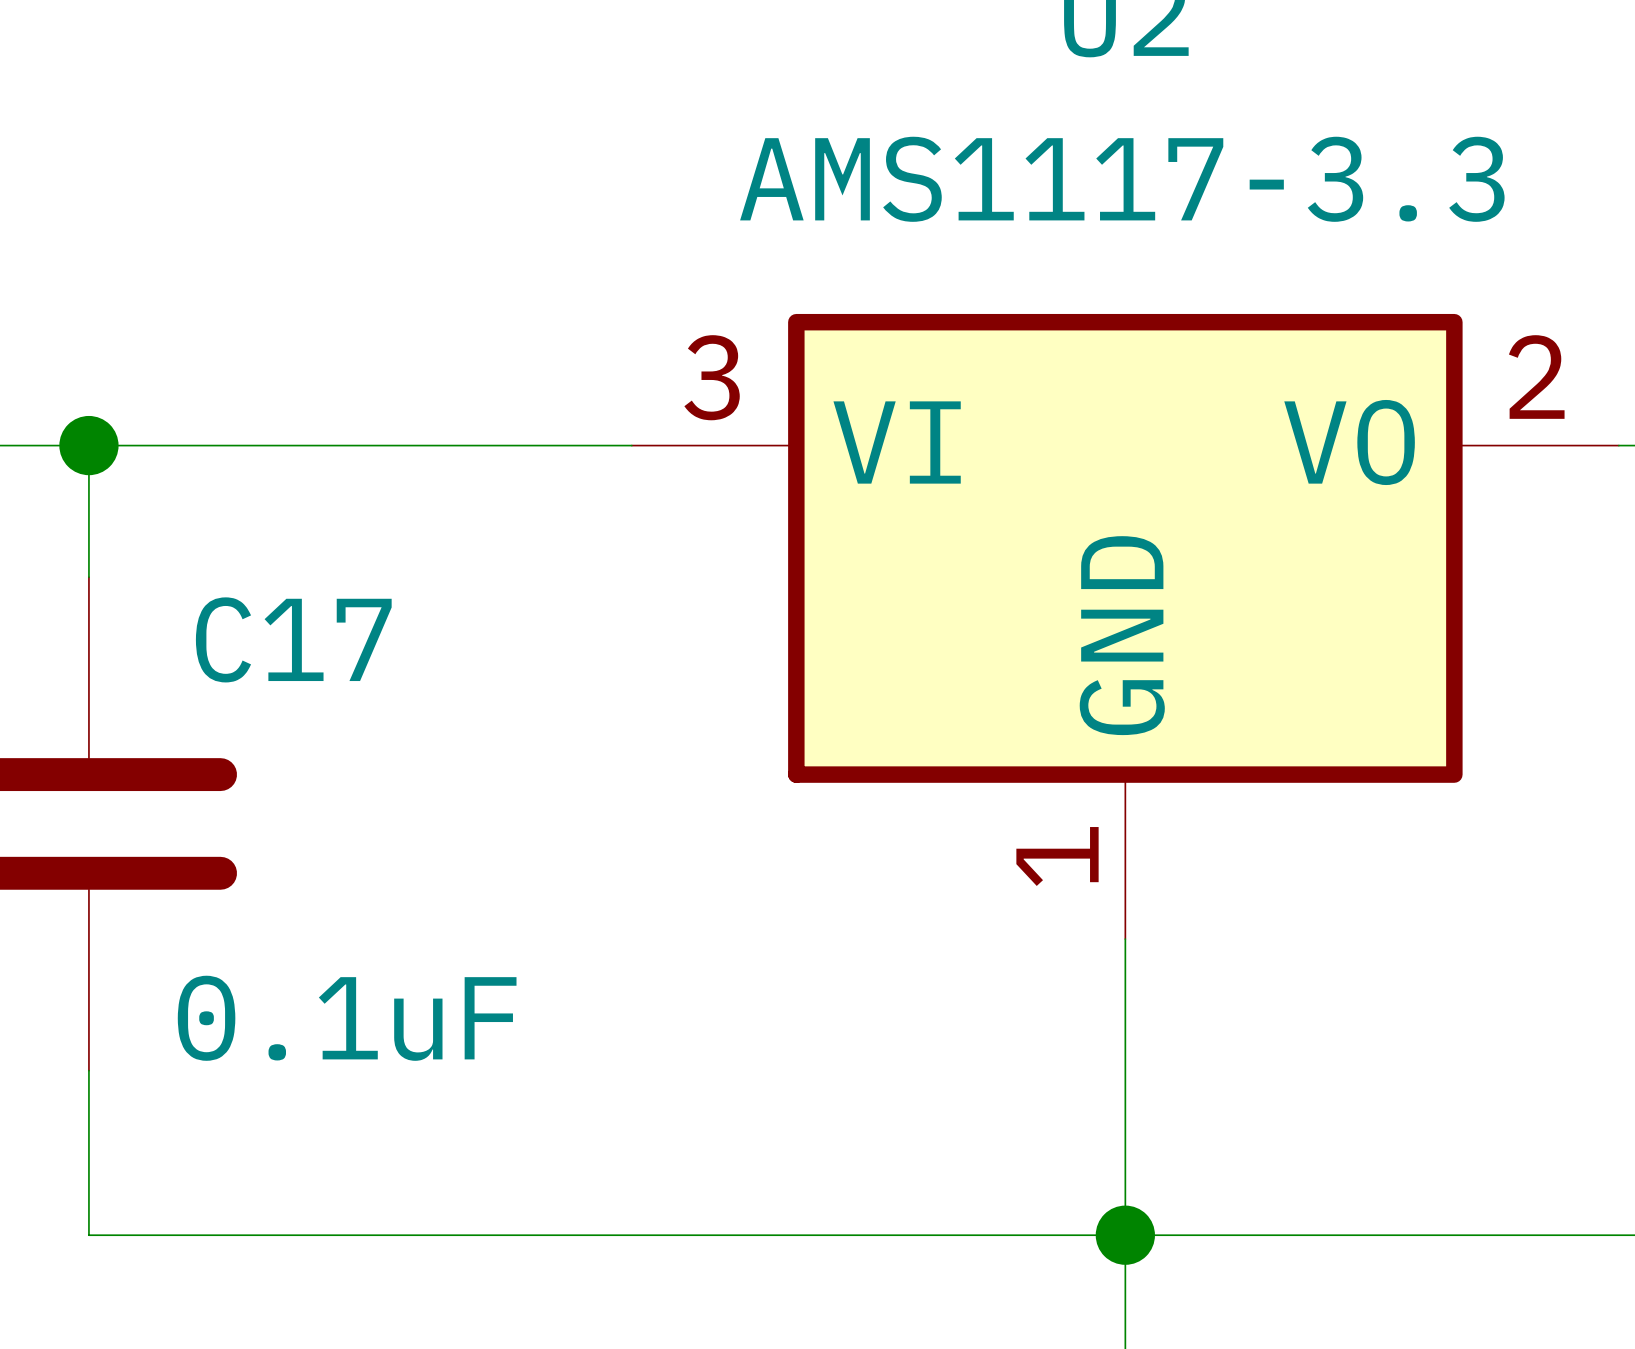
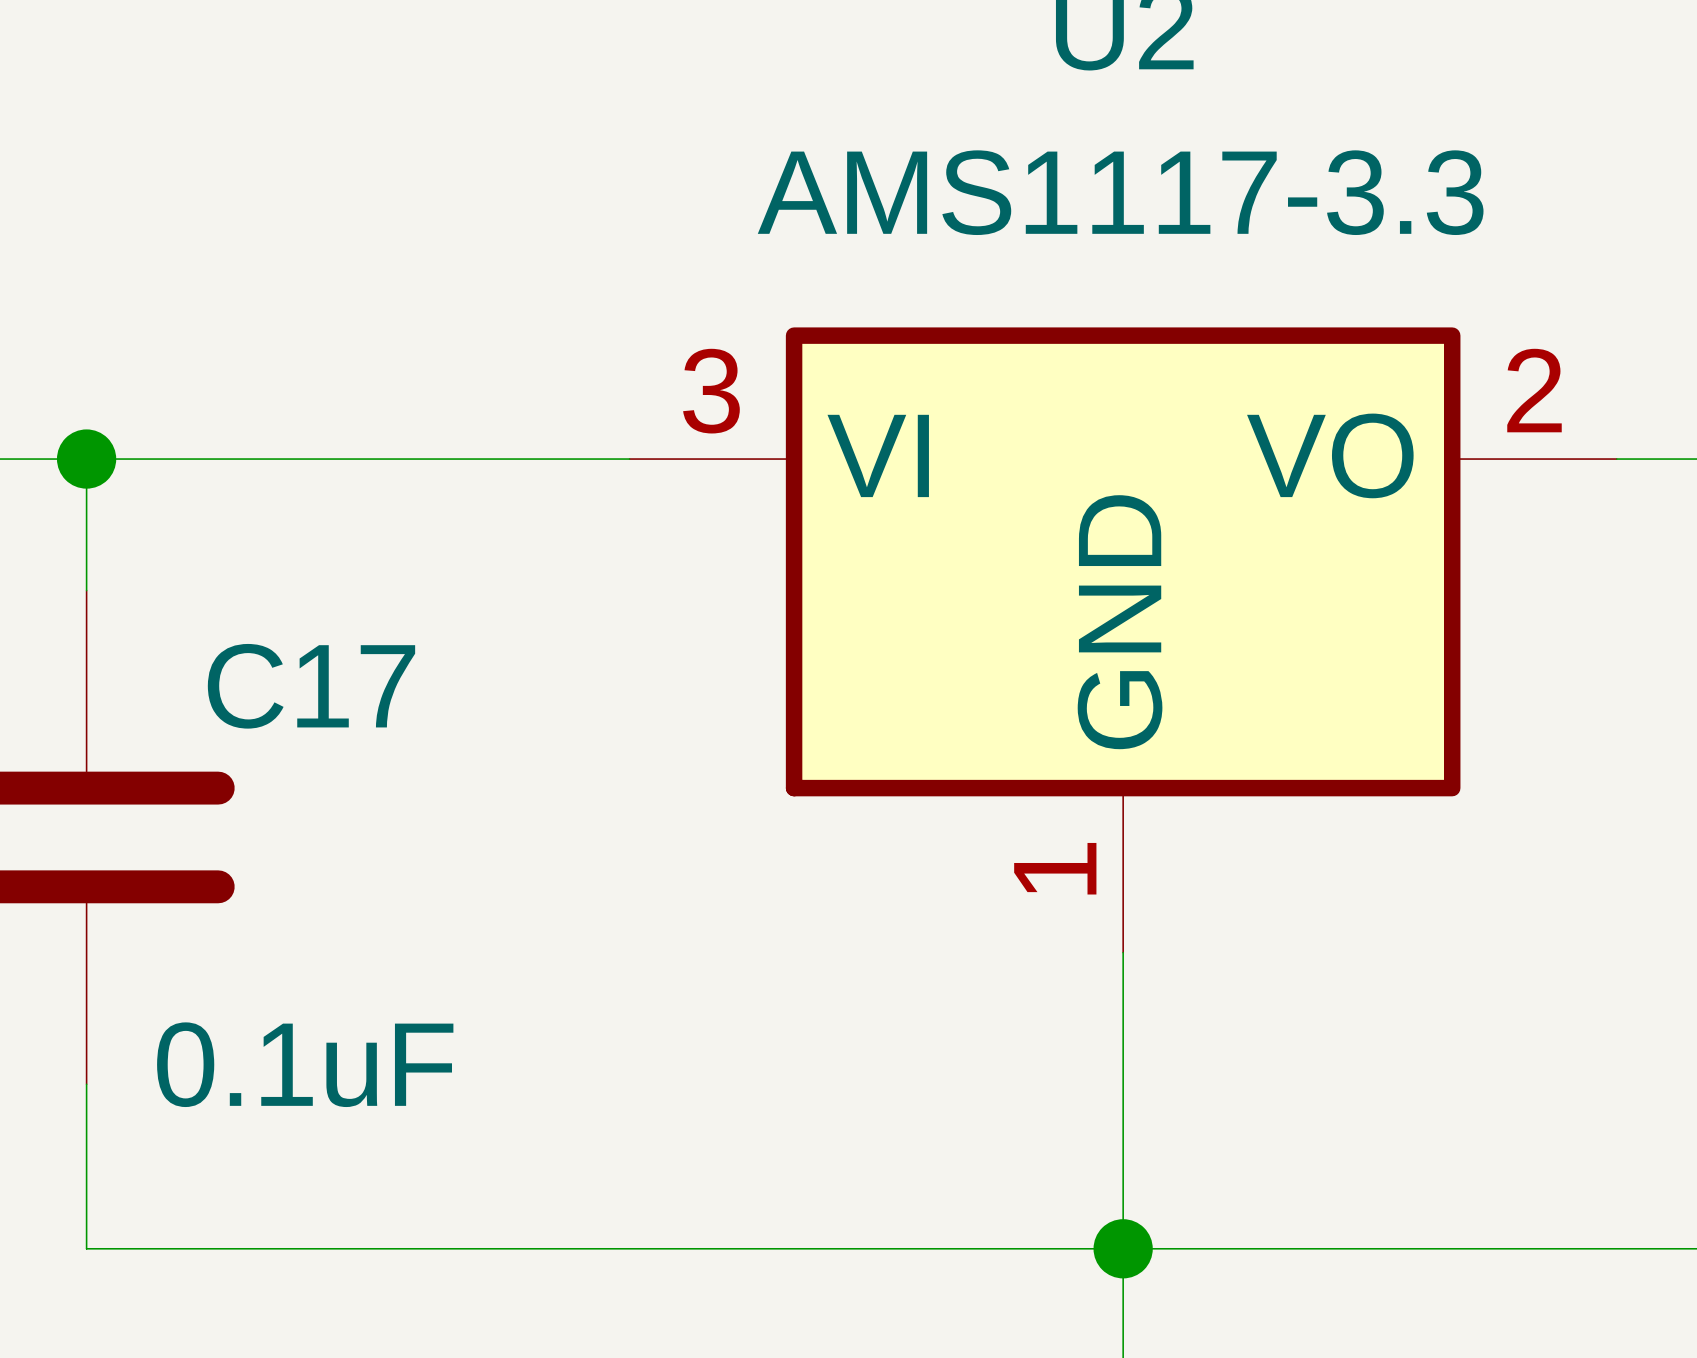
C17 name position: C17 (293, 639) -> C17 (311, 686)
C17 value position: 0.1uF (347, 1018) -> 0.1uF (305, 1064)

